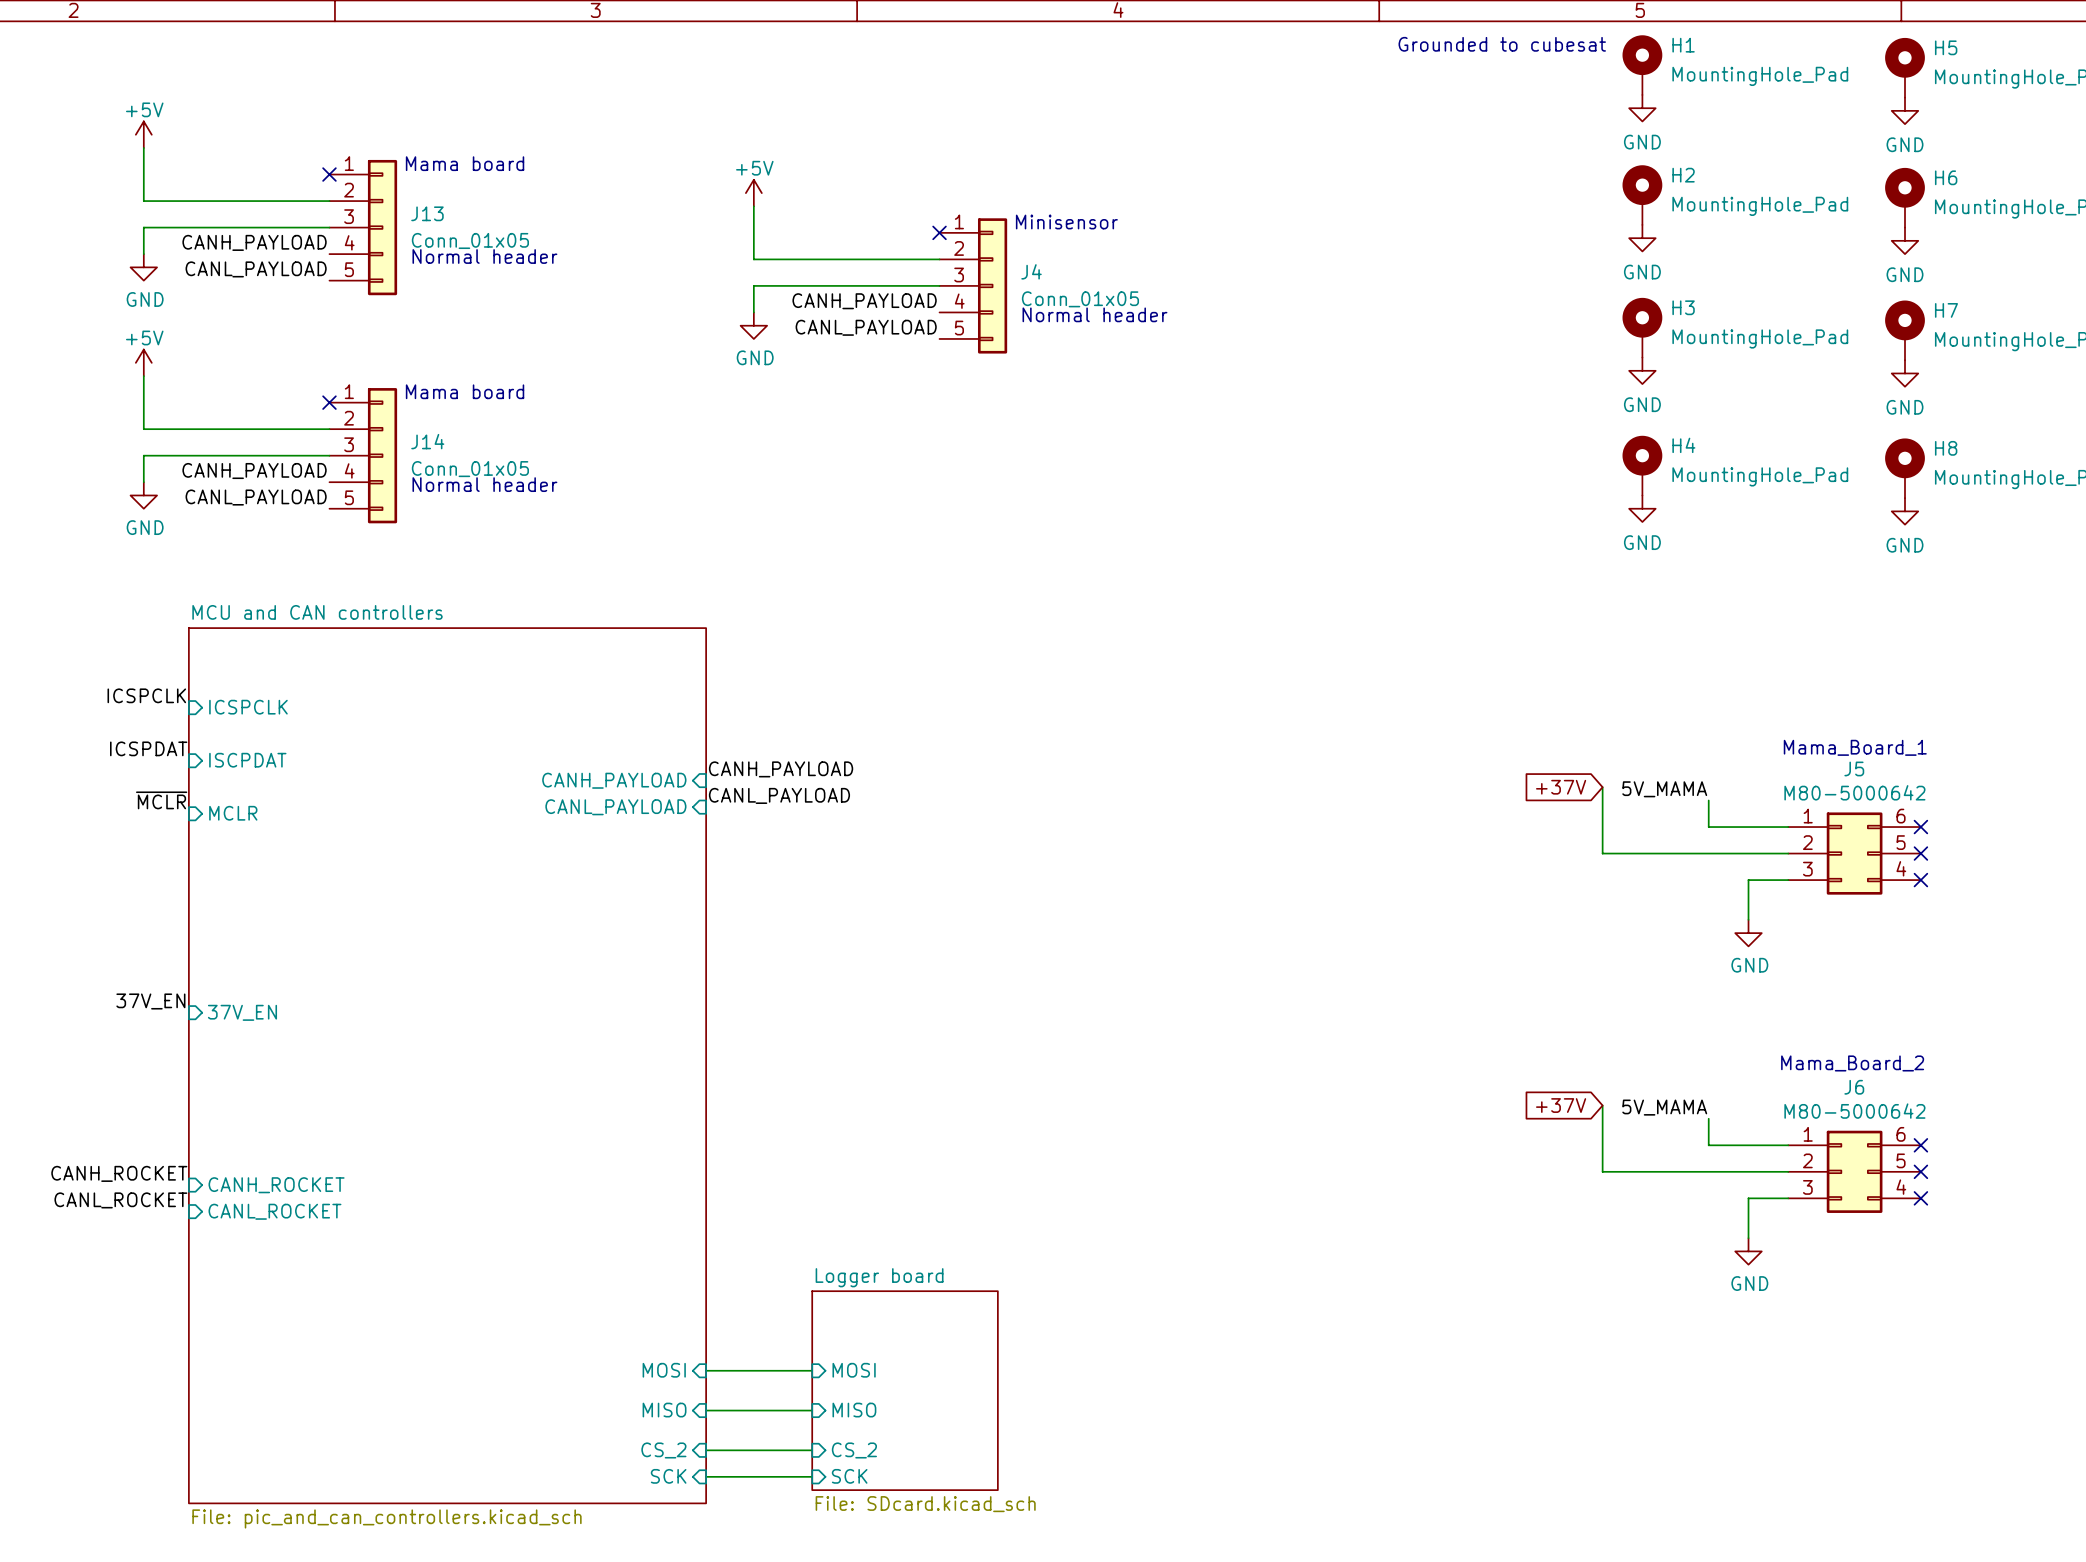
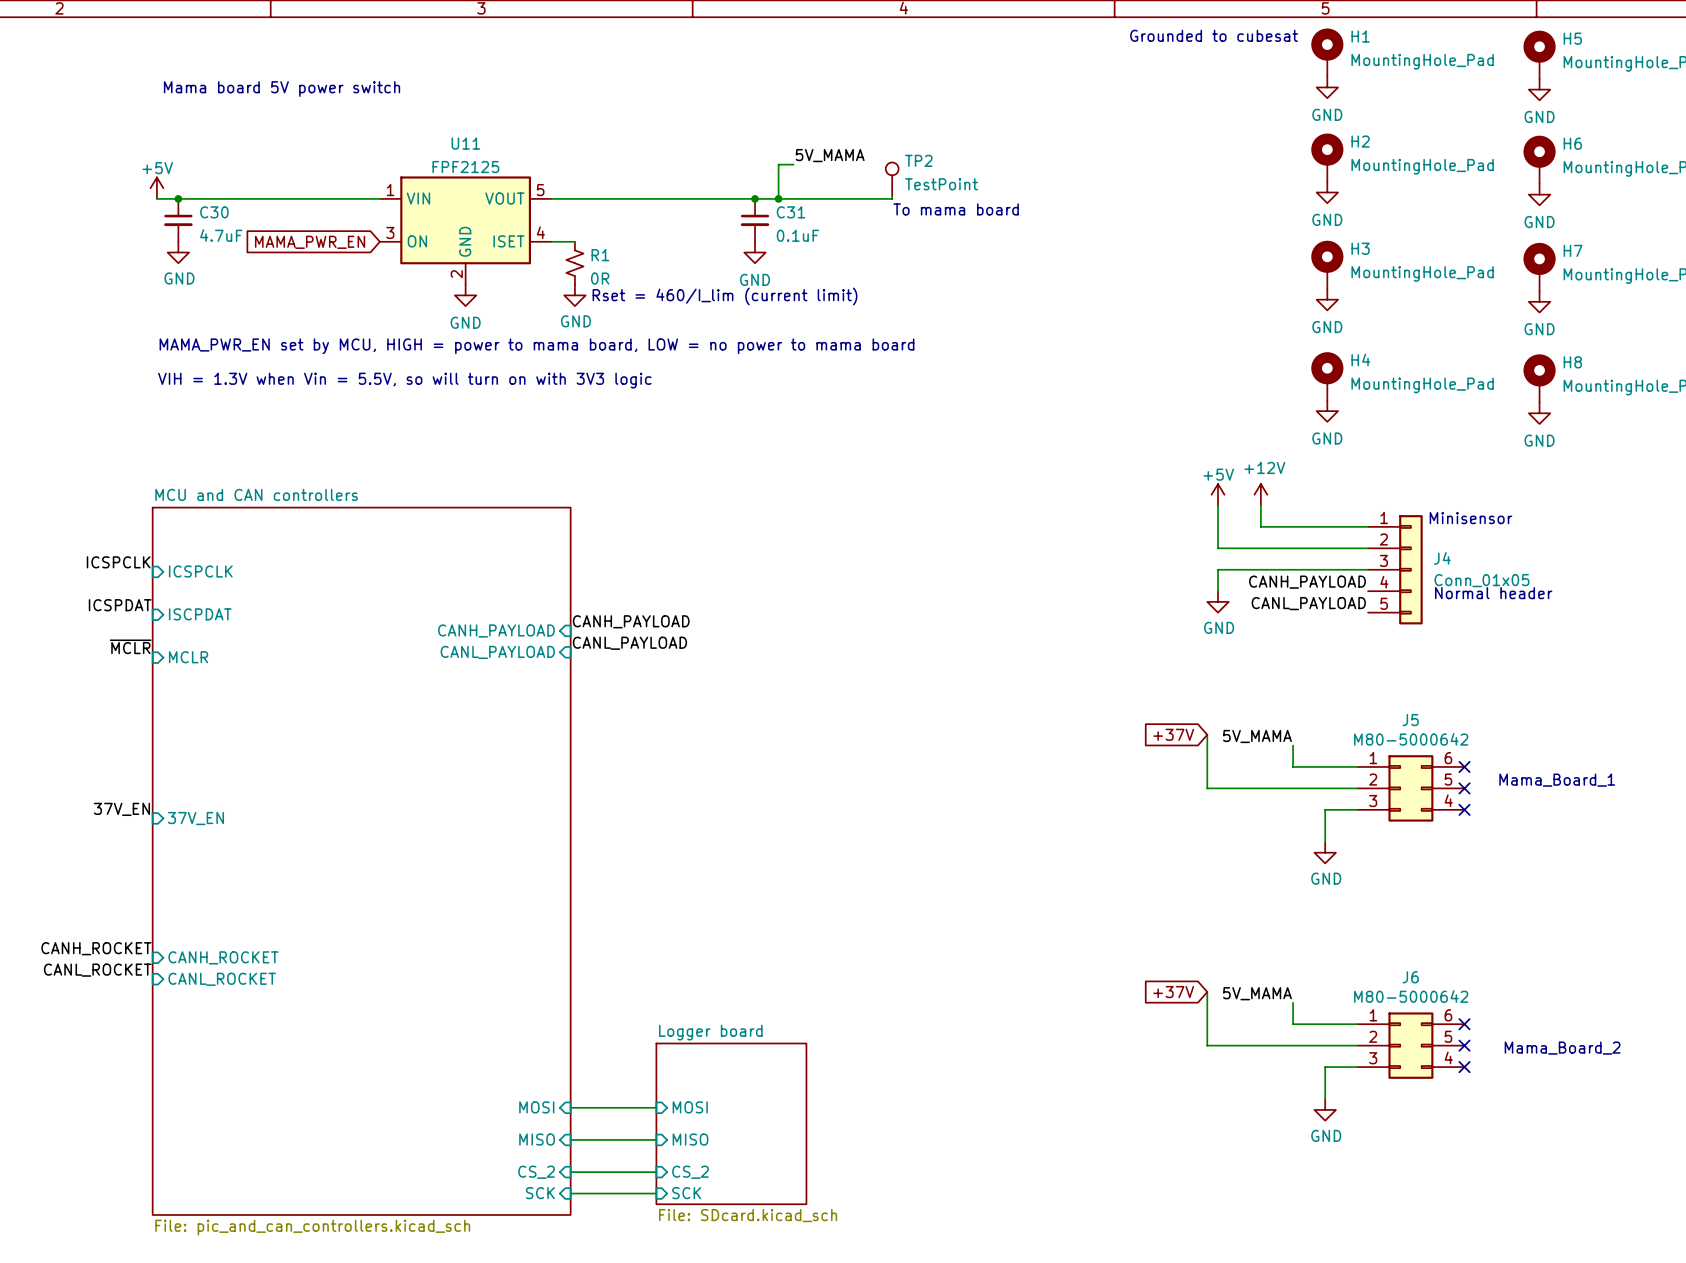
text: none -> Mama board 5V power switch (282, 89)
power symbol: +5V (143, 134) -> none
wire: (143, 148) (143, 201) (329, 201) -> none
text: Mama board (465, 163) -> none
no-connect mark: (329, 174) -> none
label: none -> 5V_MAMA (830, 155)
power symbol: +5V (753, 193) -> none
wire: none -> (793, 164) (778, 164) (778, 198)
wire: (753, 206) (753, 259) (939, 259) -> none
text: Minisensor (1066, 222) -> none
TP2: none -> TestPoint (892, 179)
wire: (329, 227) (143, 227) (143, 254) -> none
J13: Conn_01x05 (363, 227) -> none
power symbol: none -> +5V (156, 188)
no-connect mark: (939, 232) -> none
label: CANH_PAYLOAD (254, 242) -> none
wire: none -> (892, 196) (892, 198) (551, 198)
wire: none -> (156, 198) (379, 198)
junction: none -> (178, 198)
junction: none -> (755, 198)
junction: none -> (778, 198)
text: Normal header (484, 256) -> none
text: none -> To mama board (956, 209)
power symbol position: GND (143, 267) -> GND (178, 252)
label: CANL_PAYLOAD (256, 269) -> none
C30: none -> 4.7uF (178, 220)
C31: none -> 0.1uF (755, 220)
U11: none -> FPF2125 (465, 230)
wire: (939, 285) (753, 285) (753, 312) -> none
J4 position: (973, 285) -> (1395, 569)
global label: none -> MAMA_PWR_EN (310, 242)
wire: none -> (551, 241) (574, 241)
label: CANH_PAYLOAD (864, 301) -> none
power symbol: none -> GND (755, 252)
text: Normal header (1094, 314) -> none
R1: none -> 0R (574, 263)
power symbol position: GND (753, 325) -> GND (574, 295)
label: CANL_PAYLOAD (866, 327) -> none
power symbol: +5V (143, 362) -> none
power symbol: none -> GND (465, 295)
text: none -> Rset = 460/I_lim (current limit) (725, 296)
wire: (143, 376) (143, 429) (329, 429) -> none
text: Mama board (465, 391) -> none
no-connect mark: (329, 402) -> none
text: none -> MAMA_PWR_EN set by MCU, HIGH = power to mama board, LOW = no power to mama board (537, 346)
wire: (329, 455) (143, 455) (143, 482) -> none
J14: Conn_01x05 (363, 455) -> none
text: none -> VIH = 1.3V when Vin = 5.5V, so will turn on with 3V3 logic (404, 380)
label: CANH_PAYLOAD (254, 471) -> none
text: Normal header (484, 484) -> none
power symbol: GND (143, 495) -> none
label: CANL_PAYLOAD (256, 497) -> none
power symbol: none -> +5V (1218, 494)
power symbol: none -> +12V (1260, 494)
wire: none -> (1218, 505) (1218, 548) (1368, 548)
wire: none -> (1260, 505) (1260, 526) (1368, 526)
text: none -> Minisensor (1470, 518)
wire: none -> (1368, 569) (1218, 569) (1218, 591)
label: none -> CANH_PAYLOAD (1307, 582)
text: none -> Normal header (1493, 593)
power symbol: none -> GND (1218, 601)
label: none -> CANL_PAYLOAD (1308, 603)
text position: Mama_Board_1 (1855, 747) -> Mama_Board_1 (1557, 780)
global label: +37V (1561, 787) -> none
wire: (1602, 787) (1602, 853) (1788, 853) -> (1207, 734) (1207, 788) (1357, 788)
label: 5V_MAMA (1664, 789) -> none
wire: (1708, 800) (1708, 827) (1788, 827) -> (1293, 745) (1293, 766) (1357, 766)
no-connect mark: (1920, 827) -> none
J5 position: (1854, 853) -> (1410, 788)
no-connect mark: (1920, 853) -> none
wire: (1788, 880) (1748, 880) (1748, 919) -> (1357, 809) (1325, 809) (1325, 841)
no-connect mark: (1920, 880) -> none
global label: none -> +37V (1173, 734)
label: none -> 5V_MAMA (1257, 736)
power symbol: GND (1748, 933) -> none
no-connect mark: none -> (1464, 766)
no-connect mark: none -> (1464, 788)
no-connect mark: none -> (1464, 809)
power symbol: none -> GND (1325, 852)
text position: Mama_Board_2 (1852, 1063) -> Mama_Board_2 (1562, 1048)
global label: +37V (1561, 1105) -> none
wire: (1602, 1105) (1602, 1171) (1788, 1171) -> (1207, 992) (1207, 1045) (1357, 1045)
label: 5V_MAMA (1664, 1107) -> none
wire: (1708, 1118) (1708, 1145) (1788, 1145) -> (1293, 1002) (1293, 1024) (1357, 1024)
no-connect mark: (1920, 1145) -> none
J6 position: (1854, 1171) -> (1410, 1045)
no-connect mark: (1920, 1171) -> none
wire: (1788, 1198) (1748, 1198) (1748, 1238) -> (1357, 1067) (1325, 1067) (1325, 1099)
no-connect mark: (1920, 1198) -> none
global label: none -> +37V (1173, 992)
label: none -> 5V_MAMA (1257, 993)
power symbol: GND (1748, 1251) -> none
no-connect mark: none -> (1464, 1024)
no-connect mark: none -> (1464, 1045)
no-connect mark: none -> (1464, 1067)
power symbol: none -> GND (1325, 1109)

